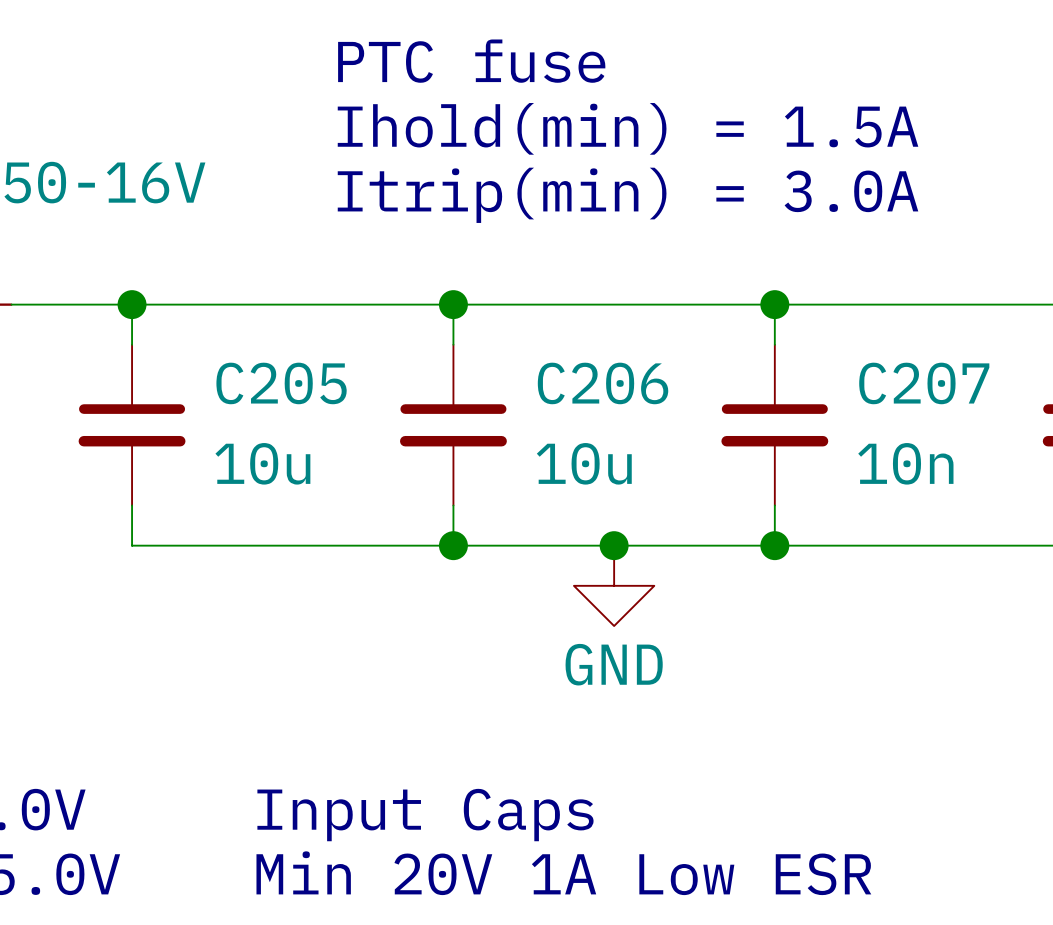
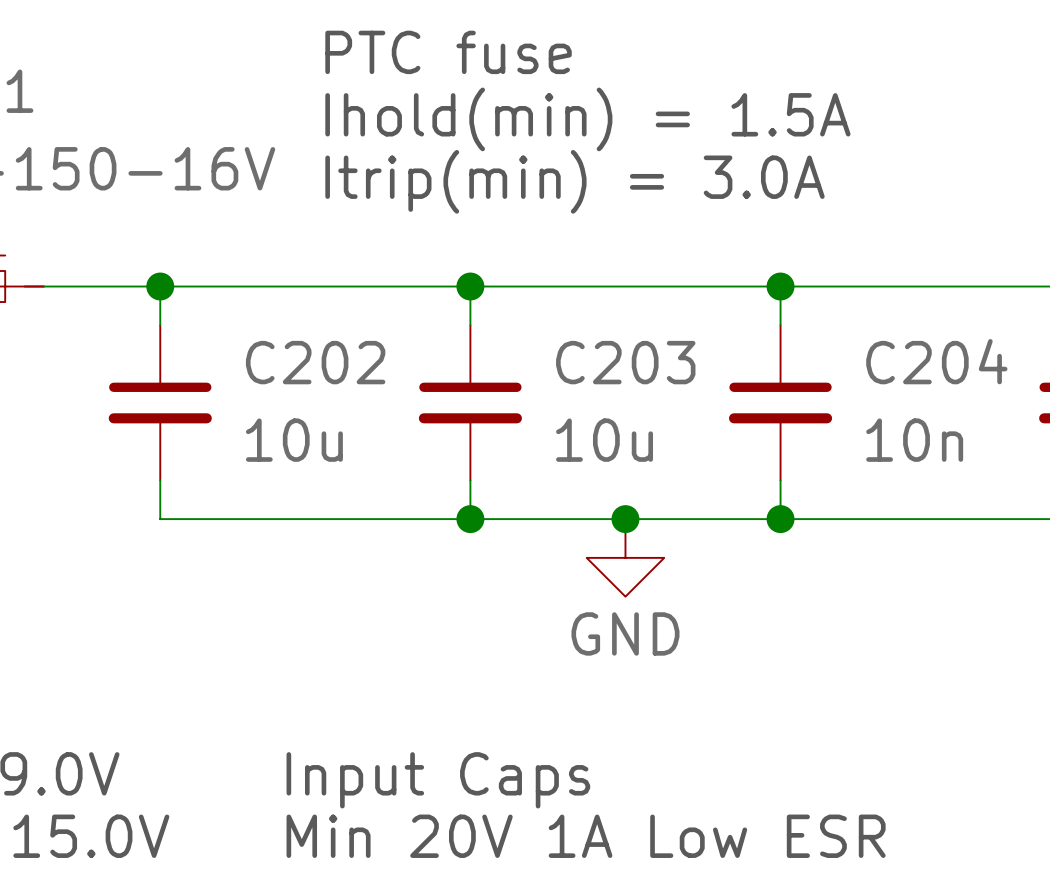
text position: PTC fuse (471, 61) -> PTC fuse (448, 52)
text position: Ihold(min) = 1.5A (628, 128) -> Ihold(min) = 1.5A (587, 119)
text position: Itrip(min) = 3.0A (628, 195) -> Itrip(min) = 3.0A (575, 181)
C205 name: C205 (281, 383) -> C202 (315, 362)
C206 name: C206 (603, 383) -> C203 (625, 362)
C207 name: C207 (924, 383) -> C204 (936, 361)

